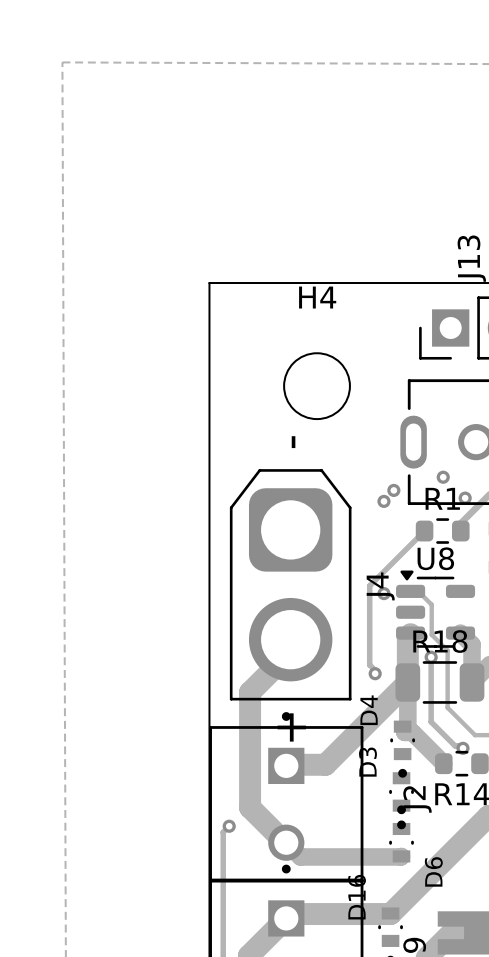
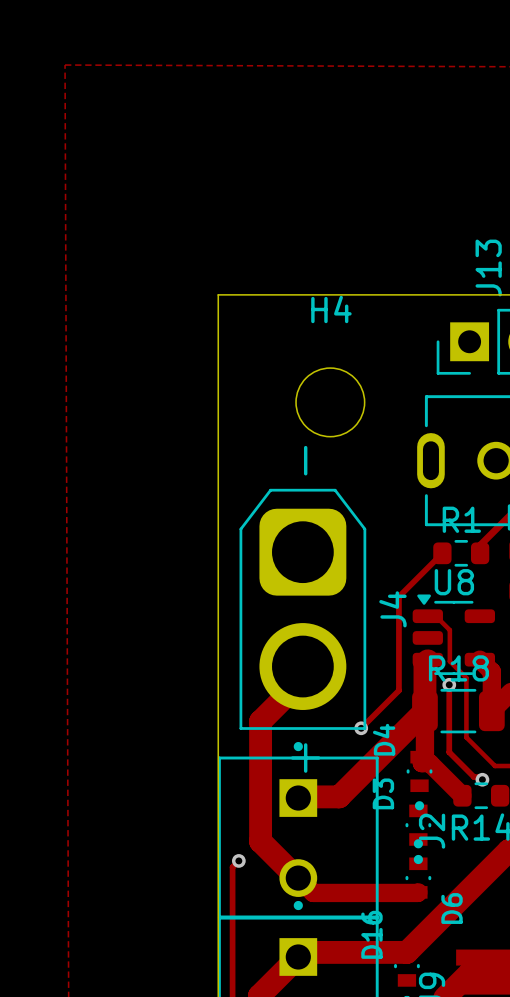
via: (443, 477) -> none
via: (393, 490) -> none
via: (465, 498) -> none
via: (383, 501) -> none
track: (382, 572) (369, 585) (369, 664) (375, 670) (375, 673) -> (398, 596) (398, 690) (361, 728)
via: (383, 593) -> none
via position: (375, 673) -> (361, 728)

